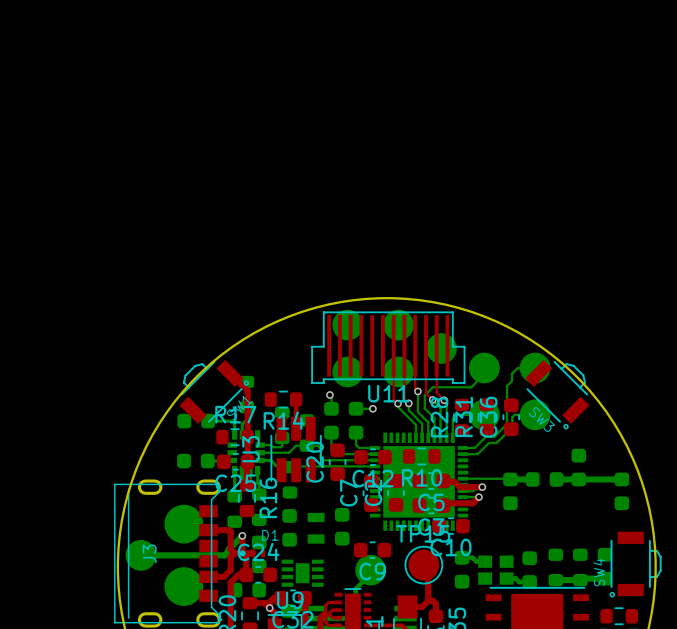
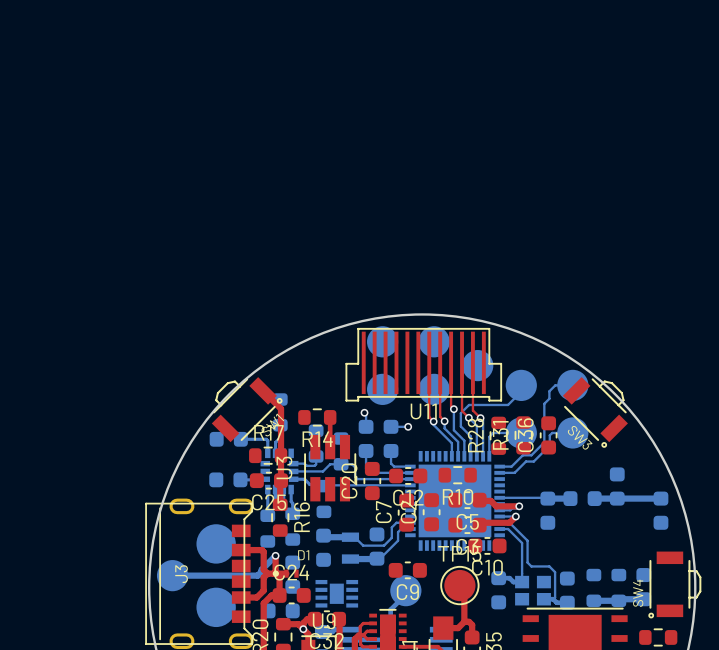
bottom track: none -> (410, 522) (396, 522) (391, 527) (391, 537) (384, 545) (363, 545) (354, 537) (325, 537)
bottom track: none -> (499, 522) (509, 522) (527, 540) (527, 562) (531, 566) (549, 566) (555, 572) (555, 597) (553, 599)
bottom track: none -> (410, 529) (401, 529) (398, 532) (398, 540) (380, 558) (350, 559)
bottom track: none -> (499, 529) (508, 529) (522, 543) (522, 582)

